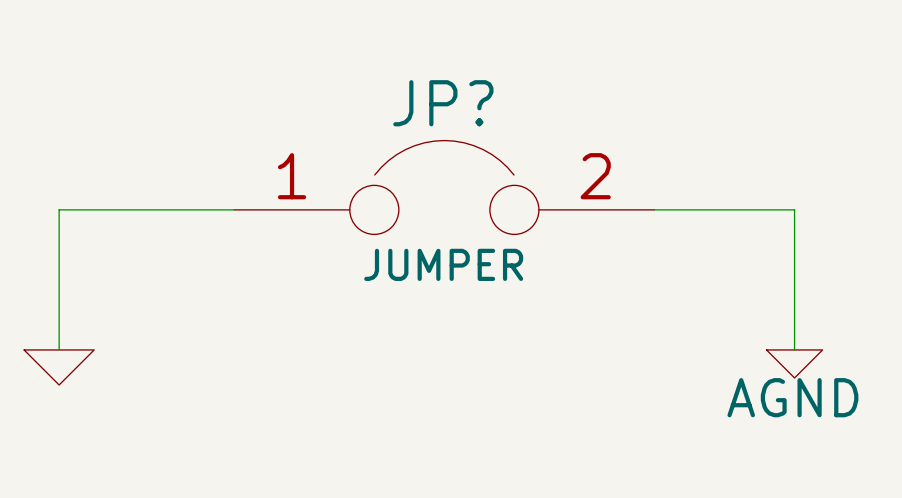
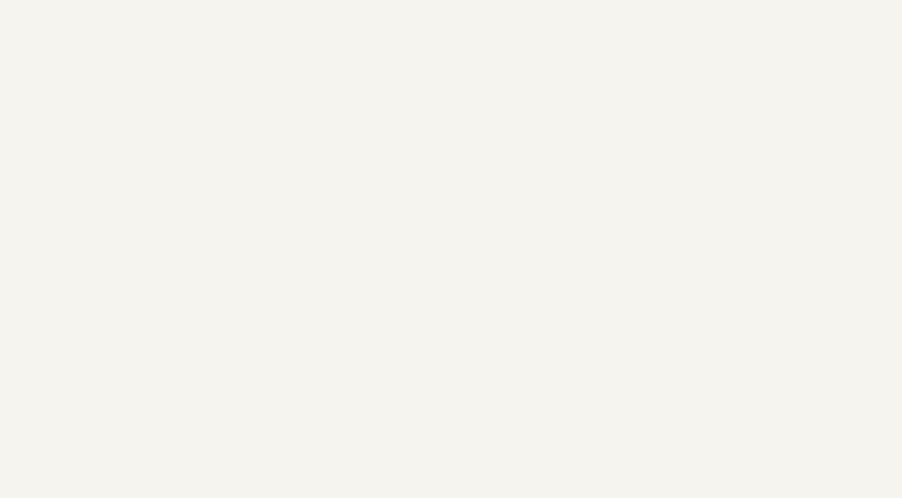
JP?: JUMPER (444, 187) -> none
wire: (234, 209) (59, 209) (59, 349) -> none
wire: (654, 209) (794, 209) (794, 349) -> none
power symbol: AGND (794, 363) -> none
power symbol: (59, 367) -> none

